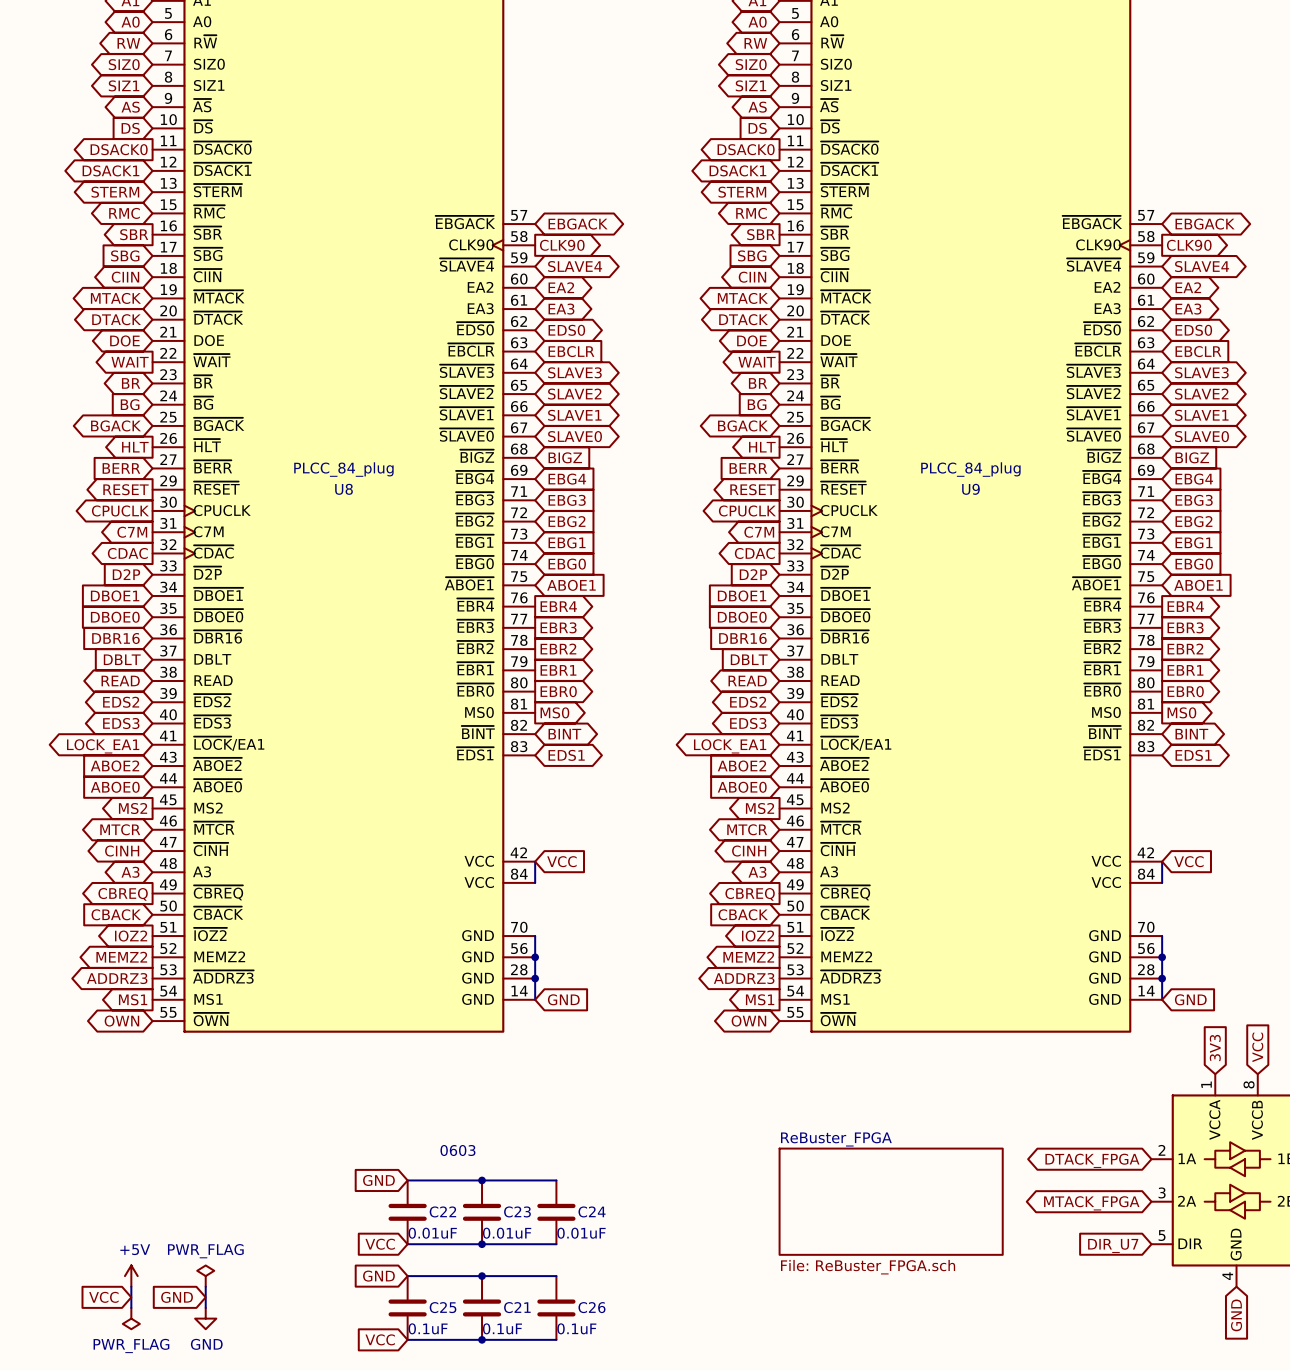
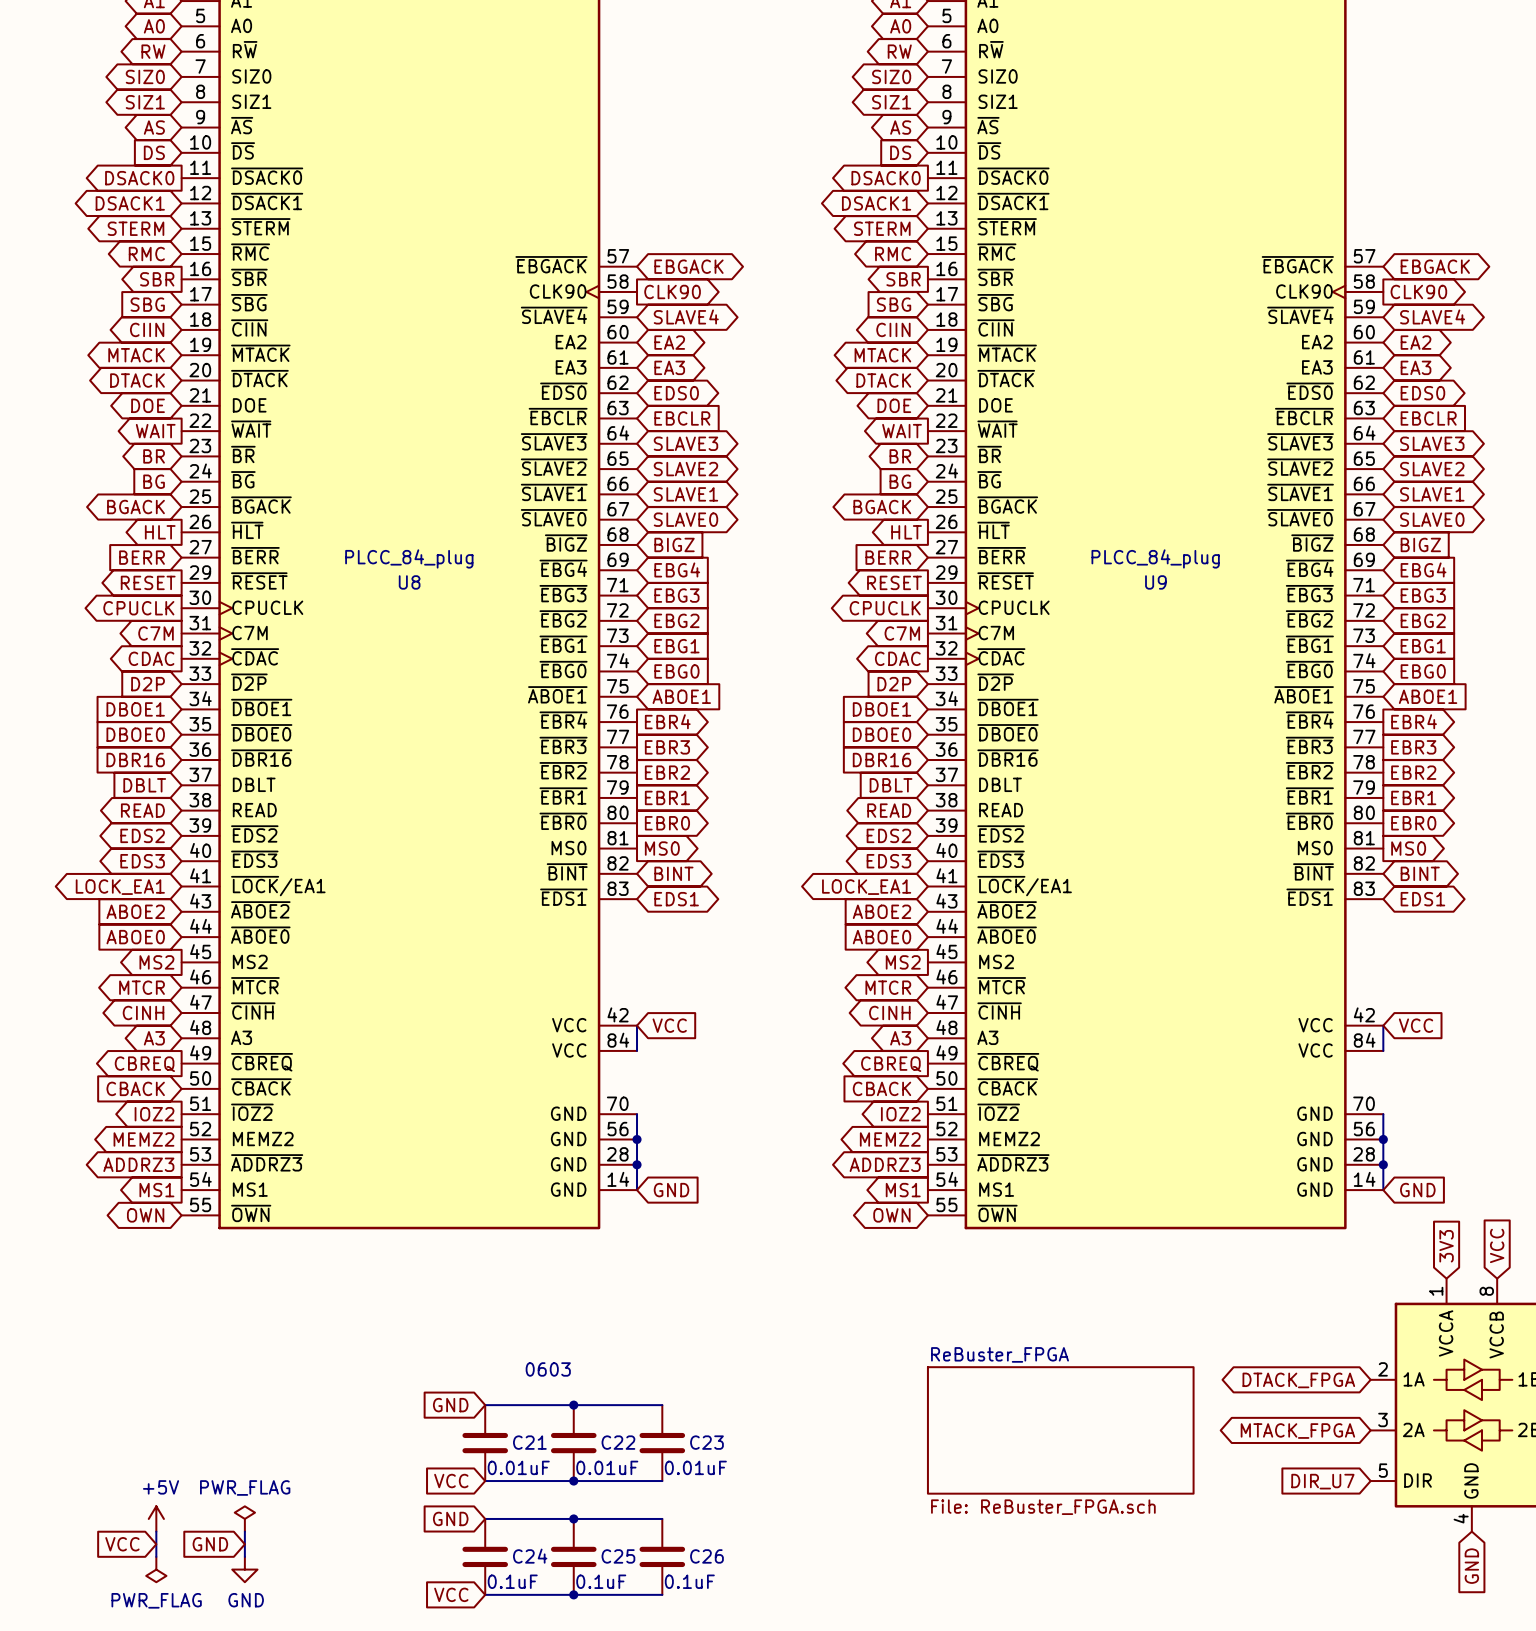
C22 name: C22 (442, 1211) -> C21 (529, 1442)
C23 name: C23 (517, 1211) -> C22 (618, 1442)
C24 name: C24 (592, 1211) -> C23 (706, 1442)
C25 name: C25 (443, 1307) -> C24 (530, 1556)
C21 name: C21 (517, 1307) -> C25 (618, 1556)

